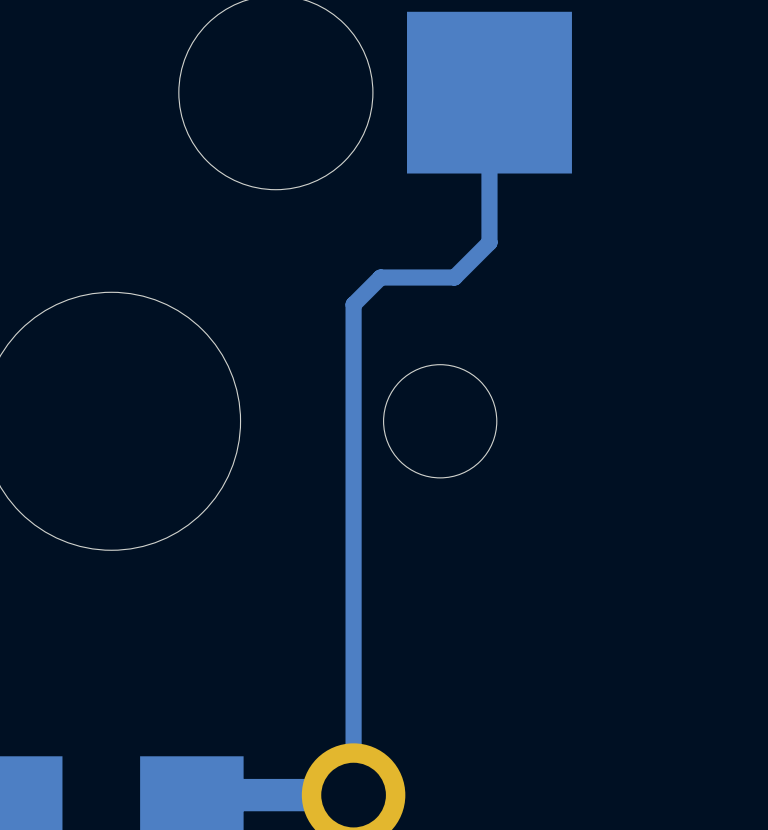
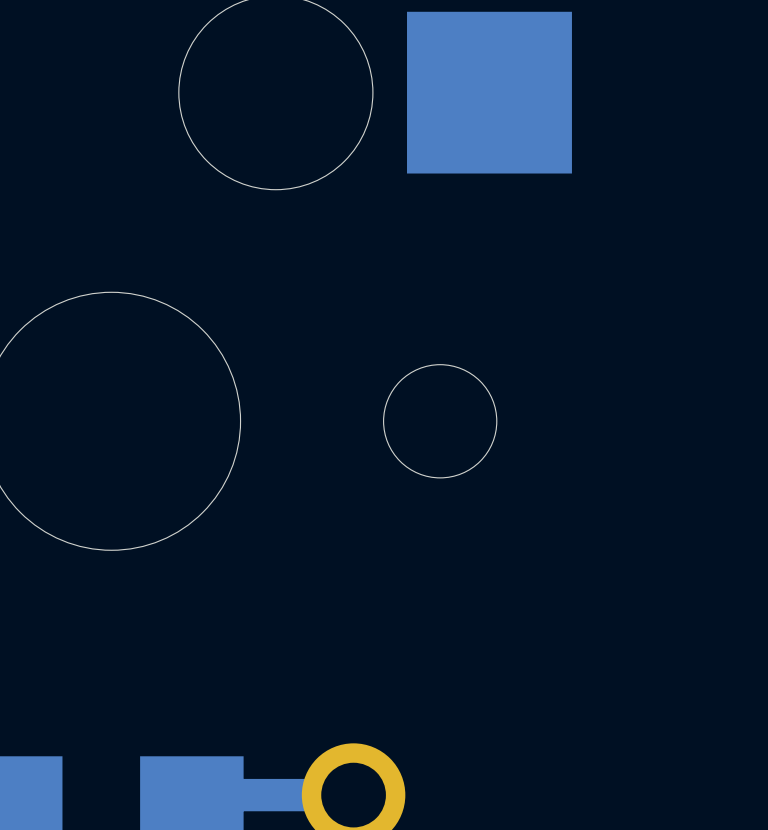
bottom track: (489, 92) (489, 242) (454, 277) (380, 277) (353, 304) (353, 795) -> none

